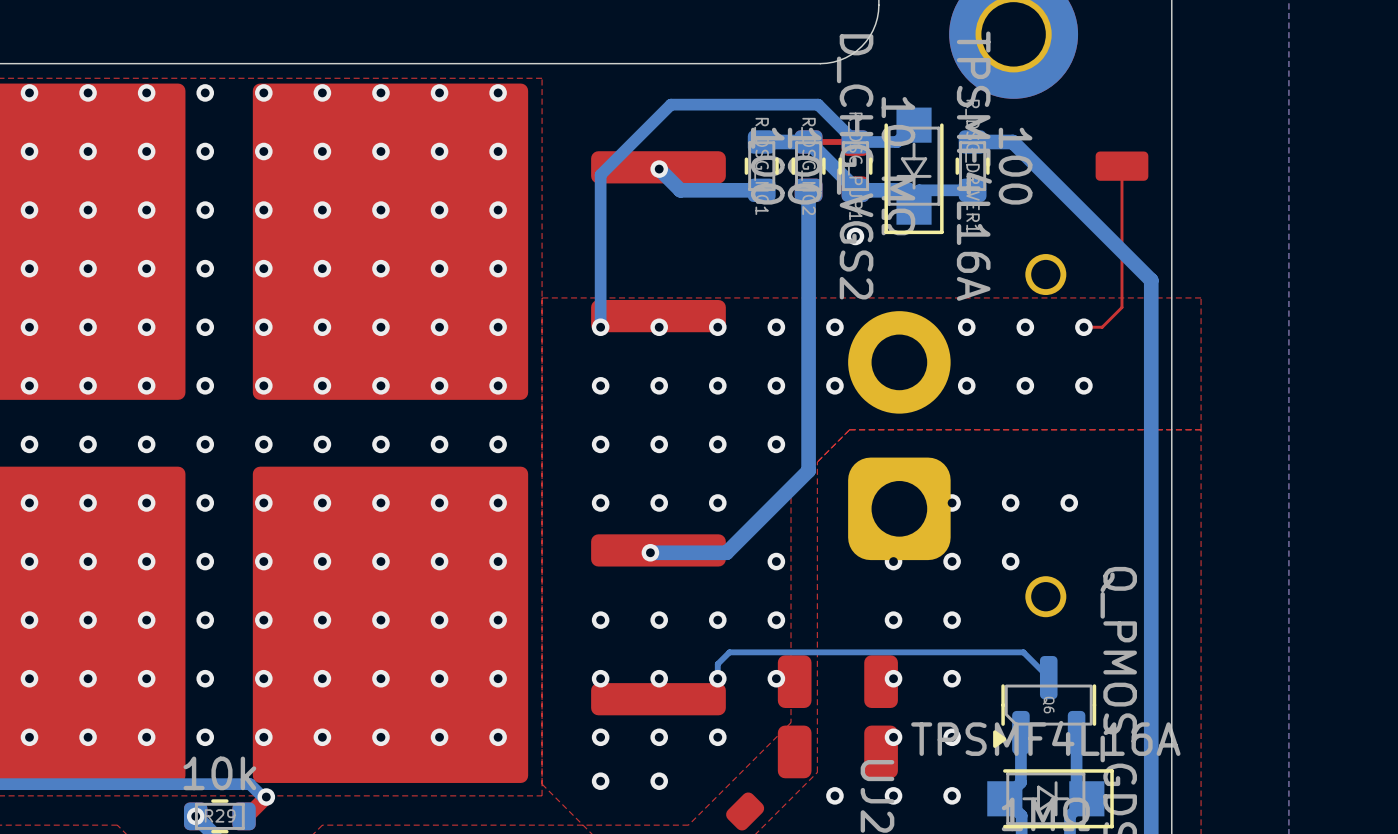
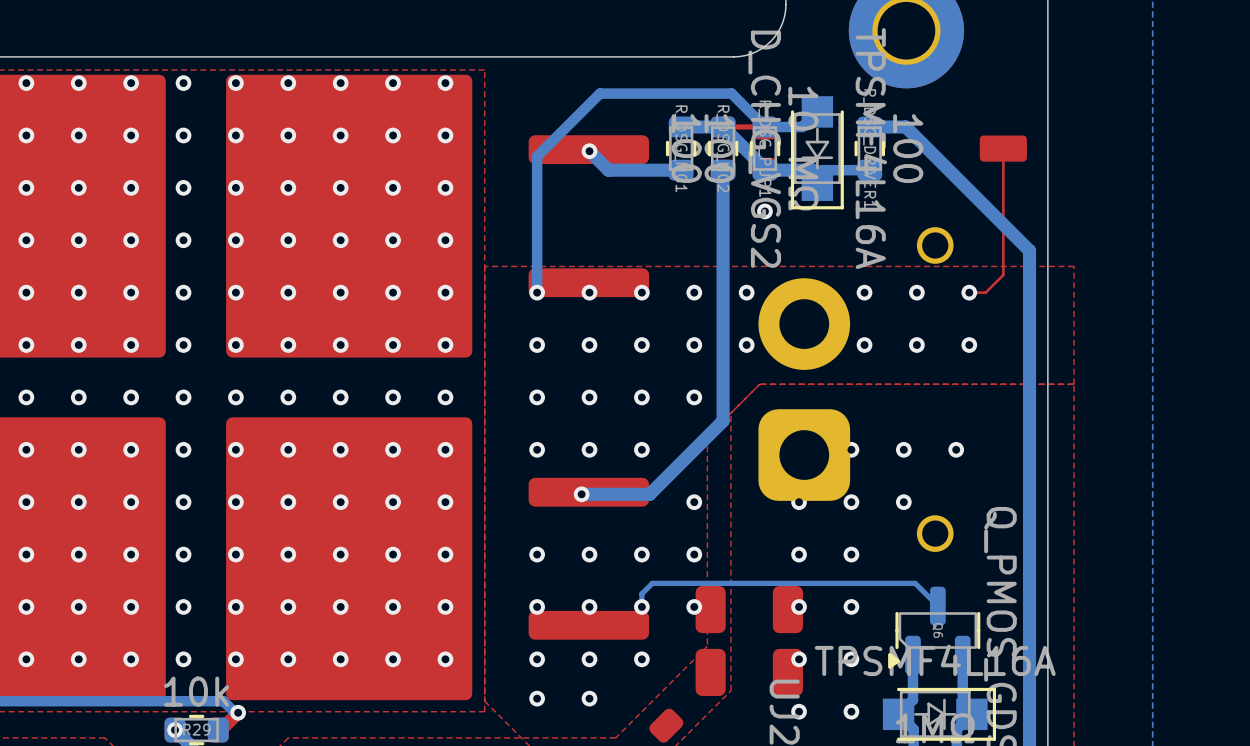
via: (834, 795) -> none

